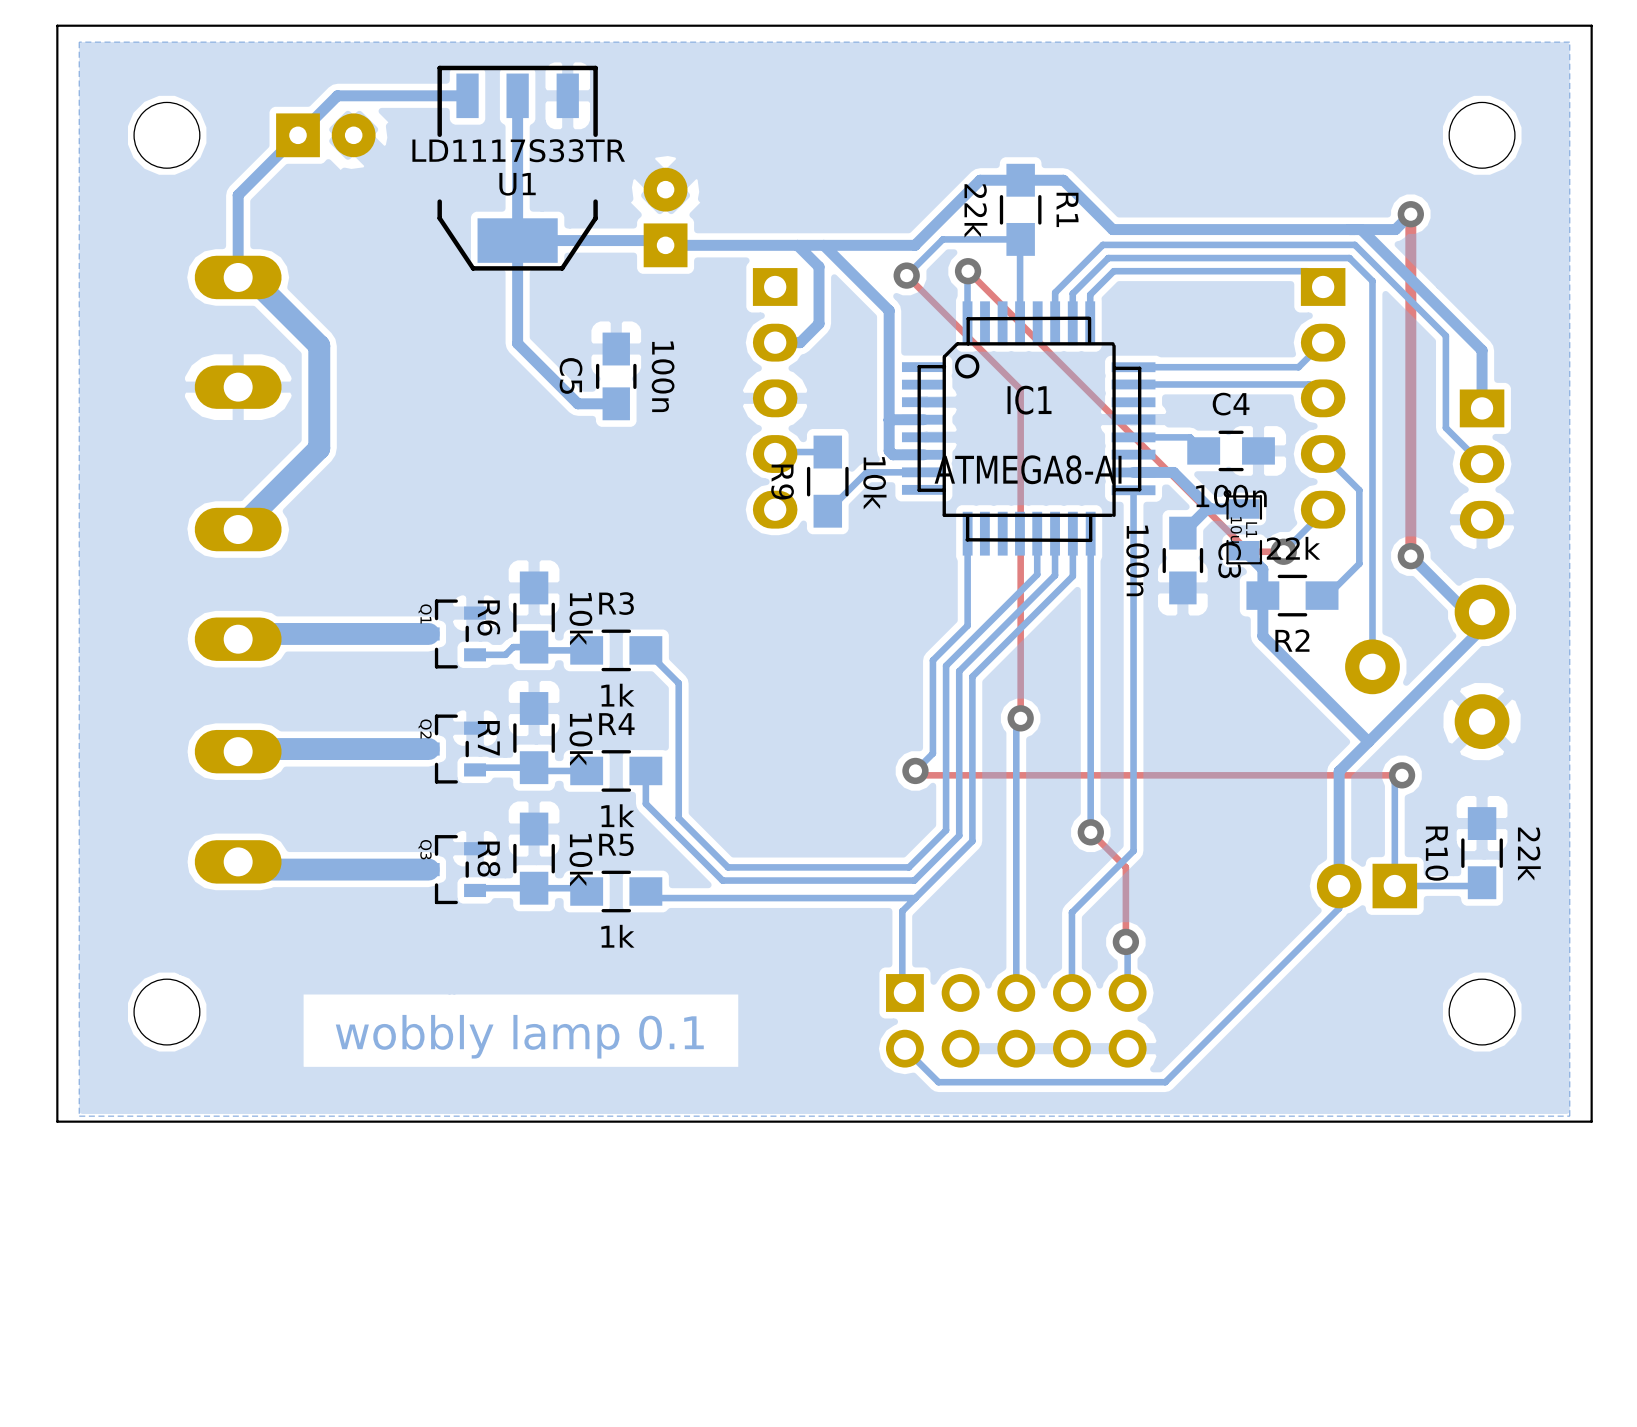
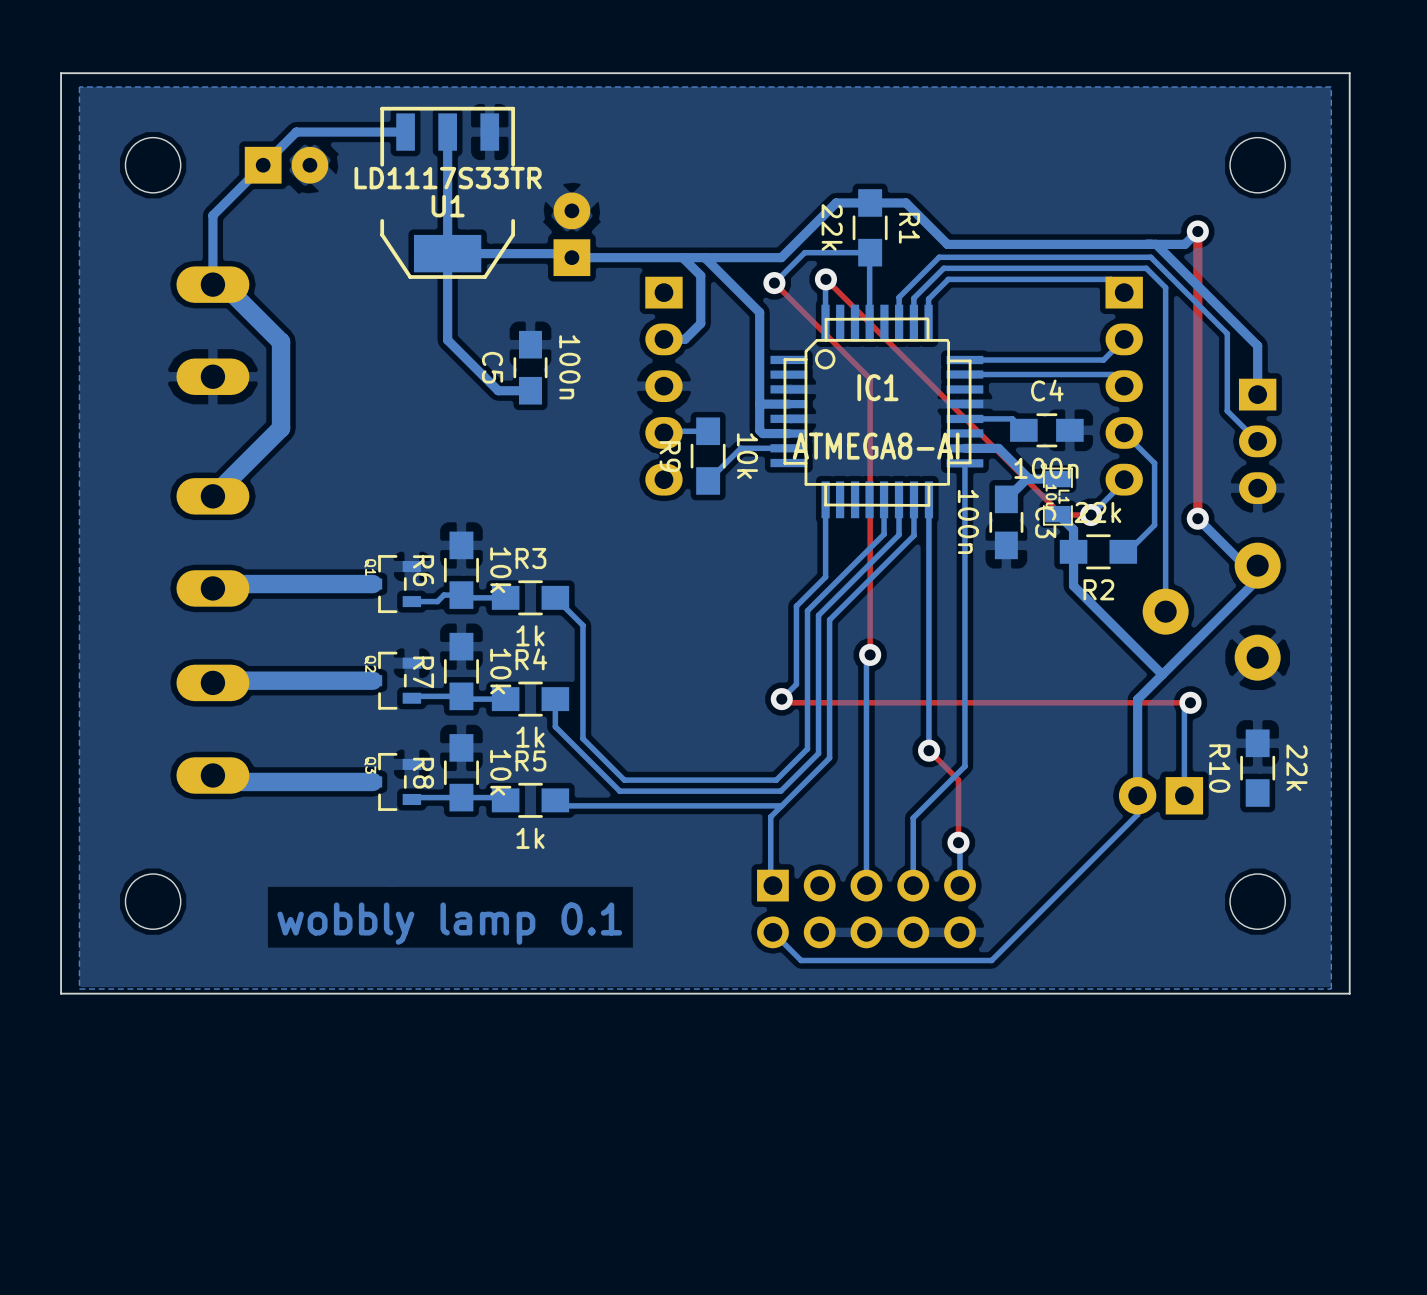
bottom track: (1482, 882) (1478, 886) (1394, 886) -> none

